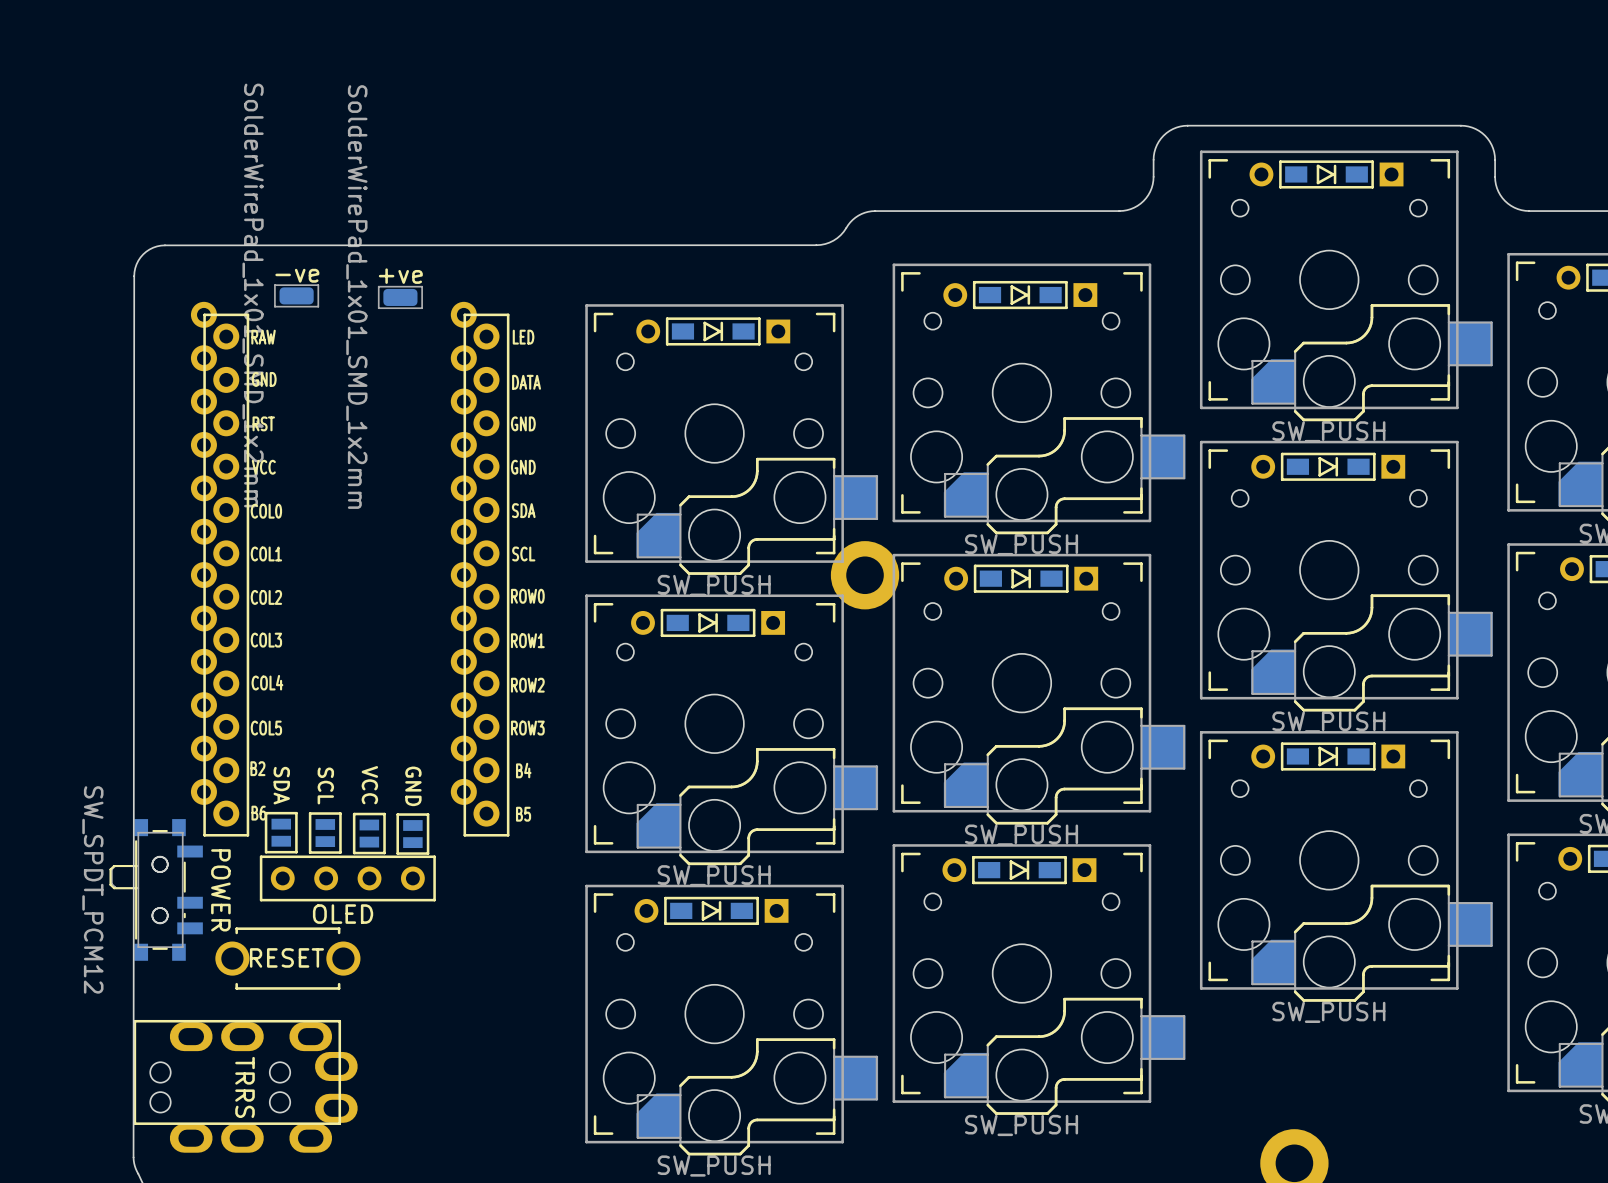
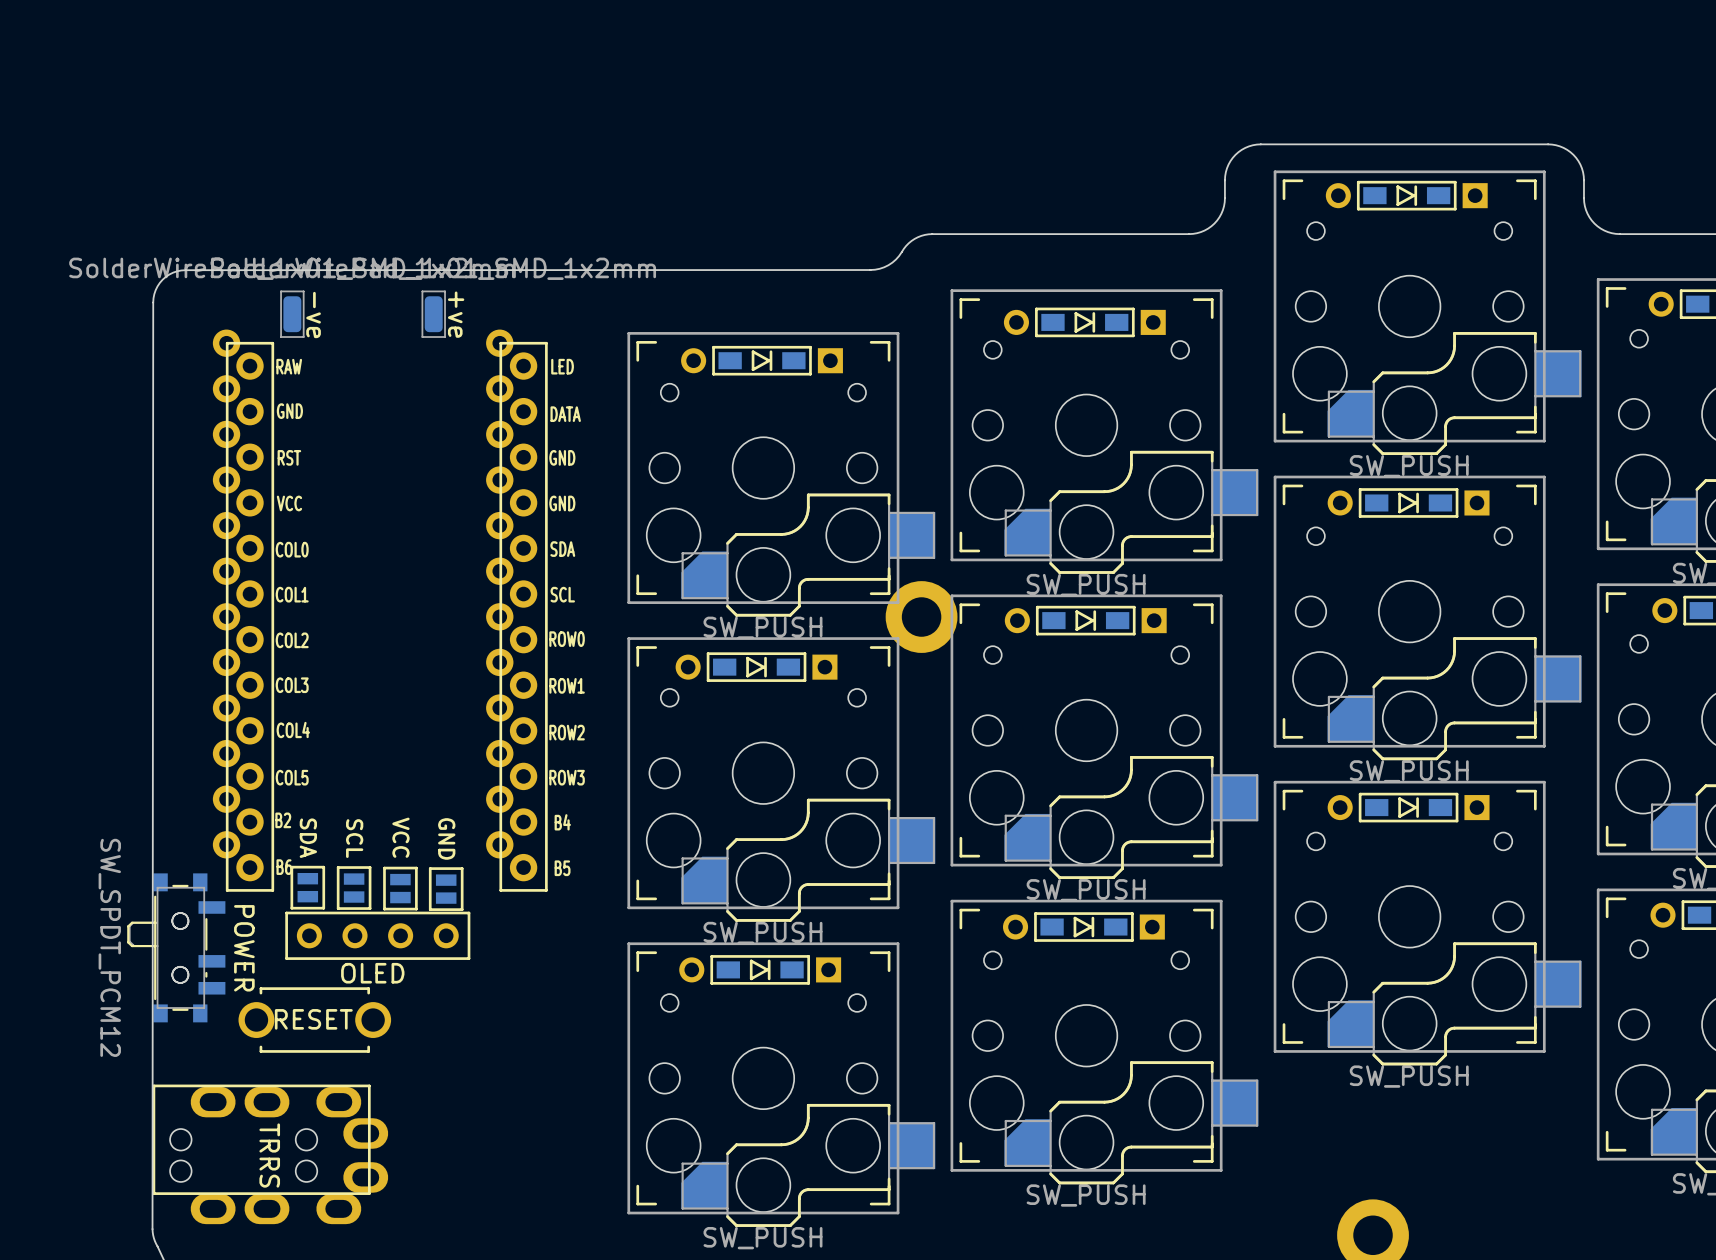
-ve rotation: 0° (296, 295) -> 90° clockwise (292, 314)
-ve position: (296, 295) -> (292, 314)
+ve rotation: 0° (400, 297) -> 90° clockwise (433, 314)

